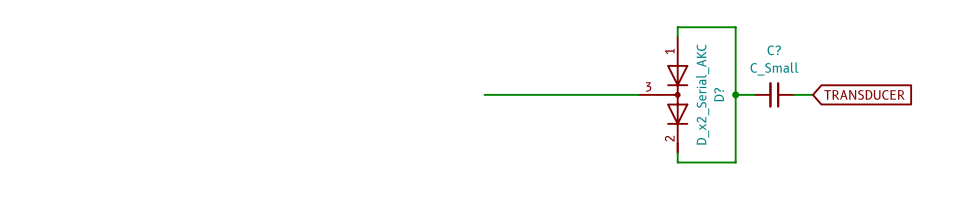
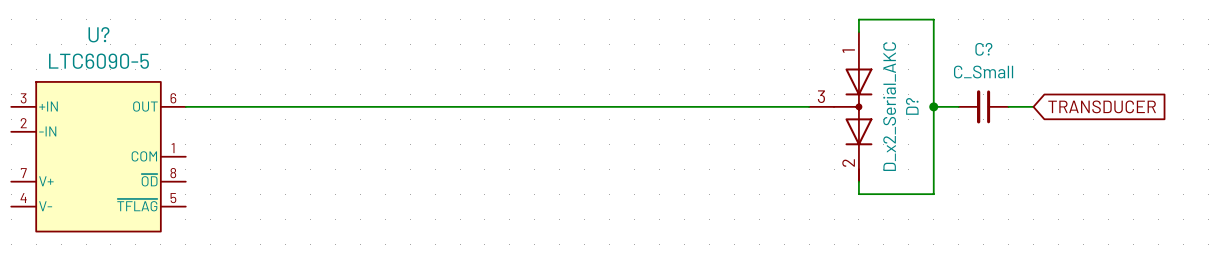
wire: none -> (185, 106) (609, 106)
U?: none -> LTC6090-5 (98, 156)

